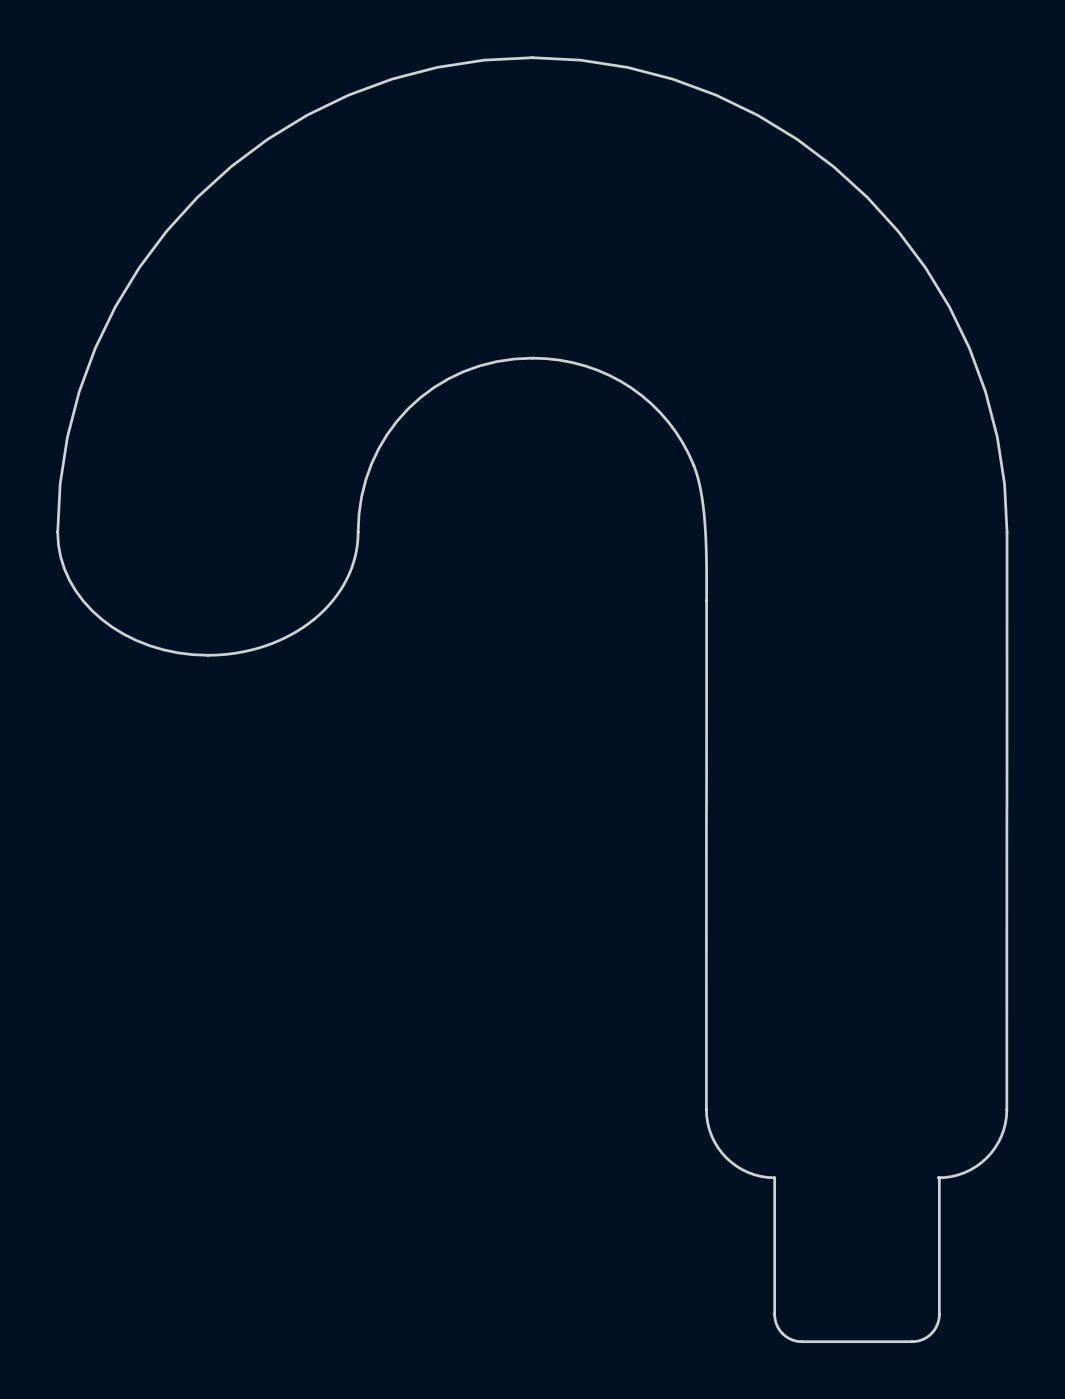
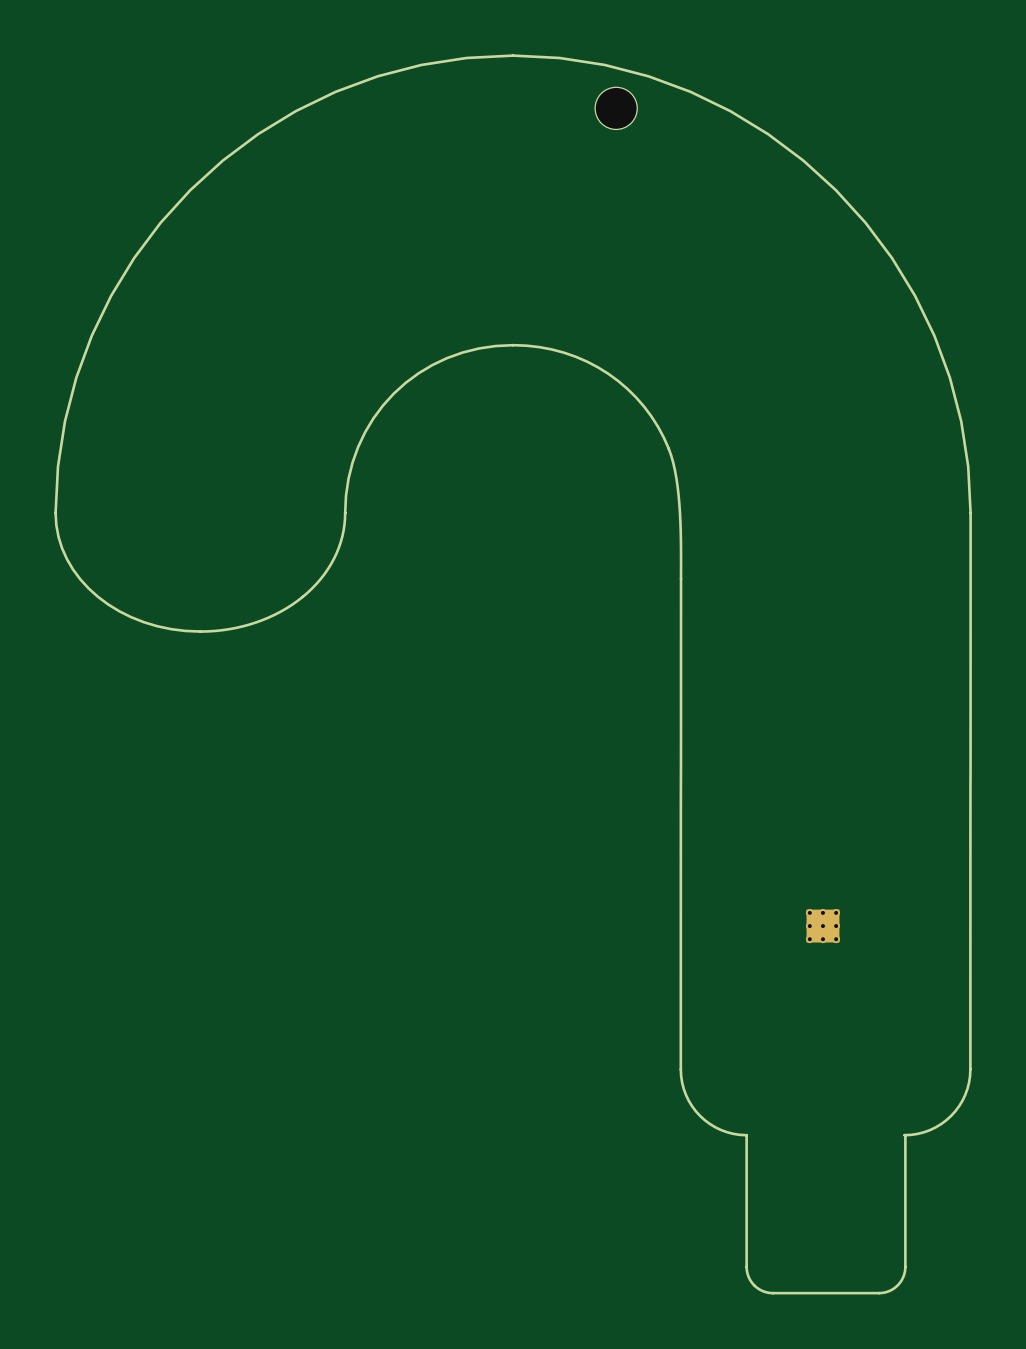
part: none -> (616, 108)
part: none -> (822, 926)

